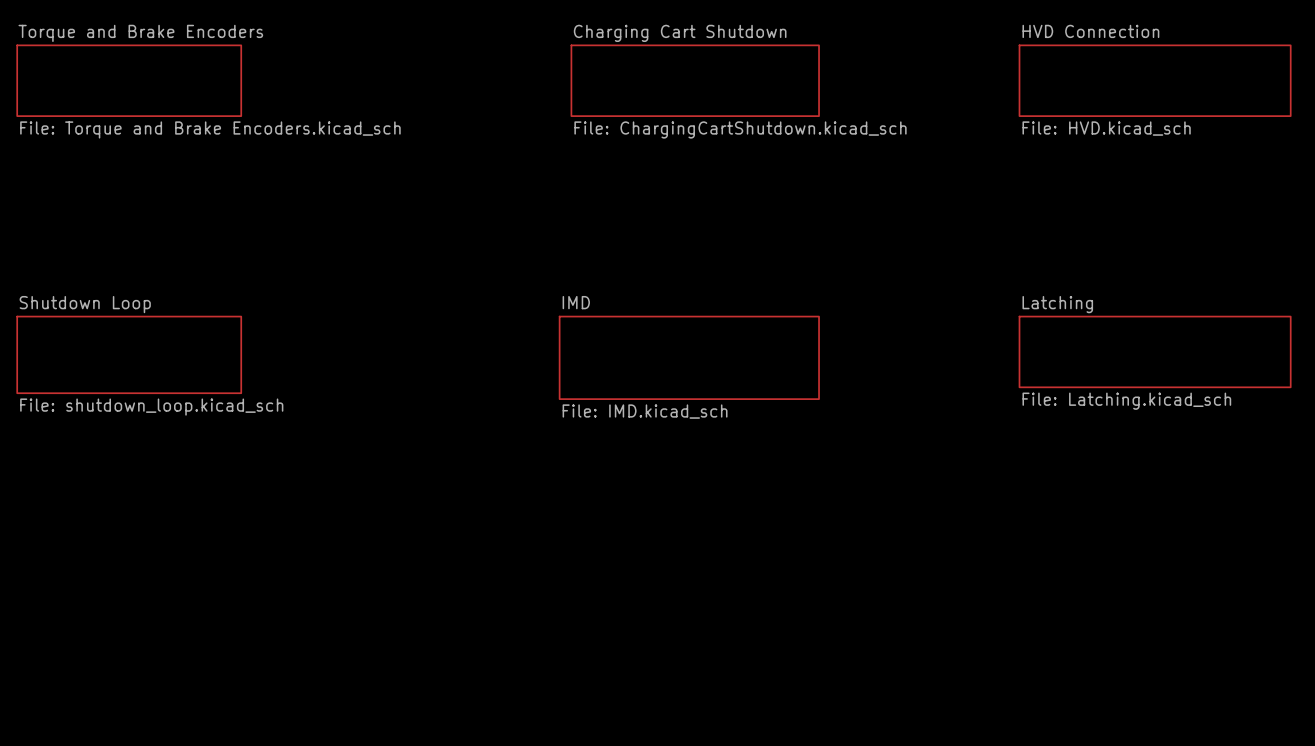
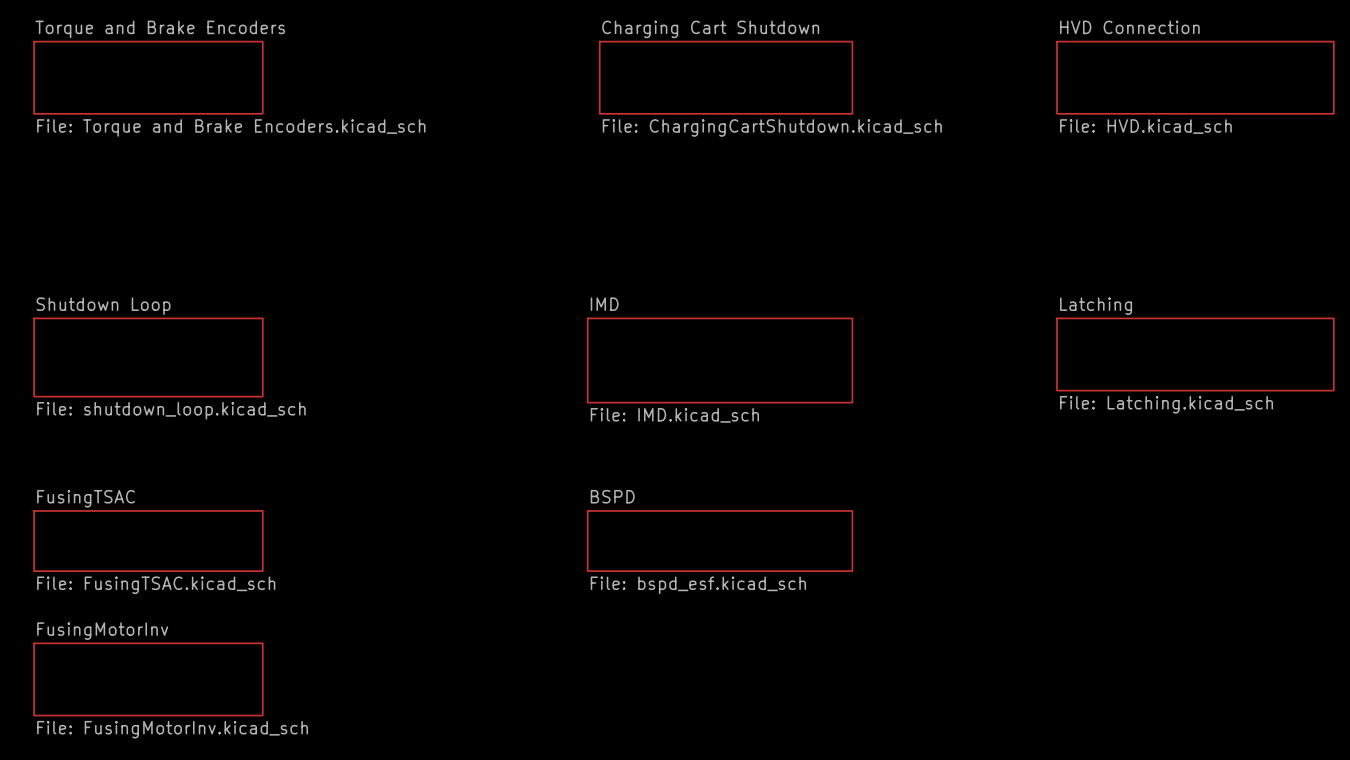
sheet FusingTSAC: none -> File: FusingTSAC.kicad_sch (148, 541)
sheet BSPD: none -> File: bspd_esf.kicad_sch (720, 541)
sheet FusingMotorInv: none -> File: FusingMotorInv.kicad_sch (148, 679)

